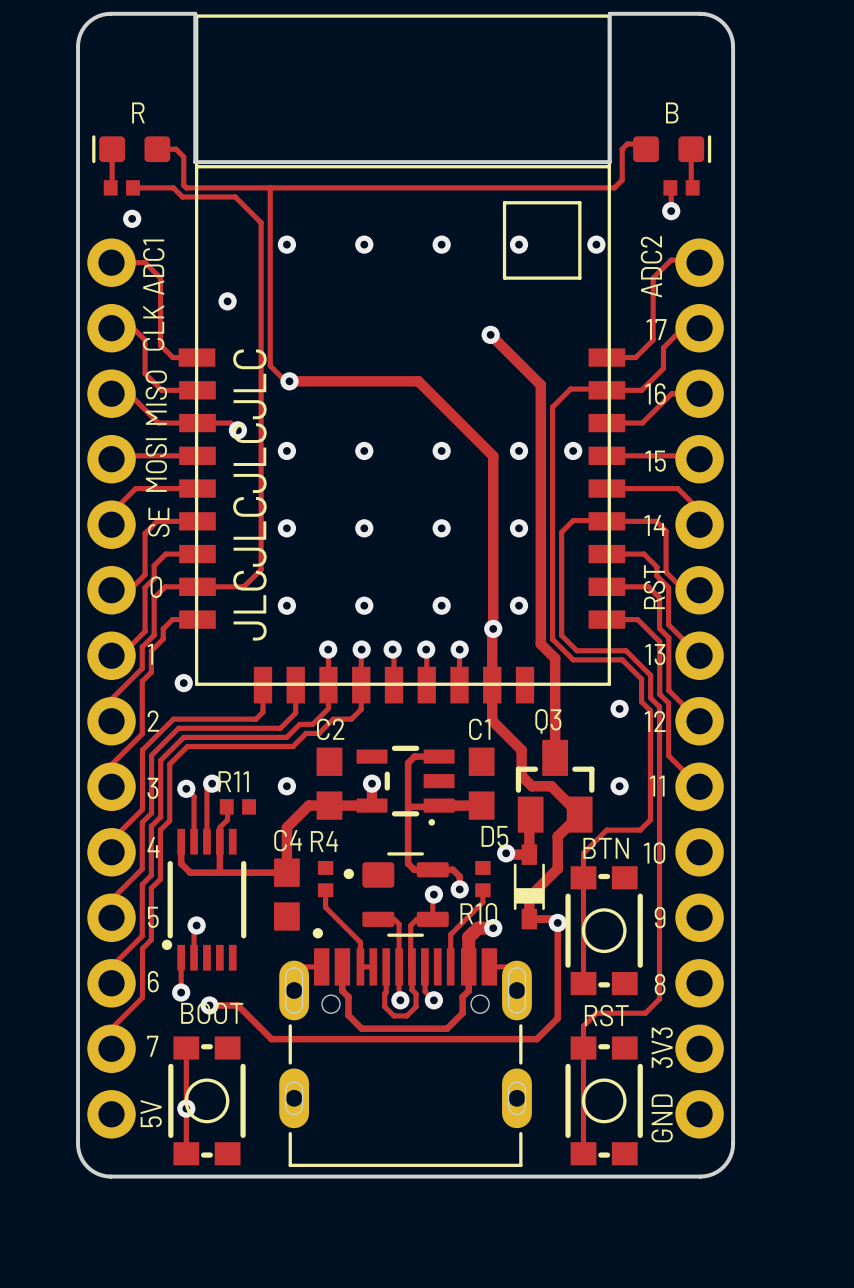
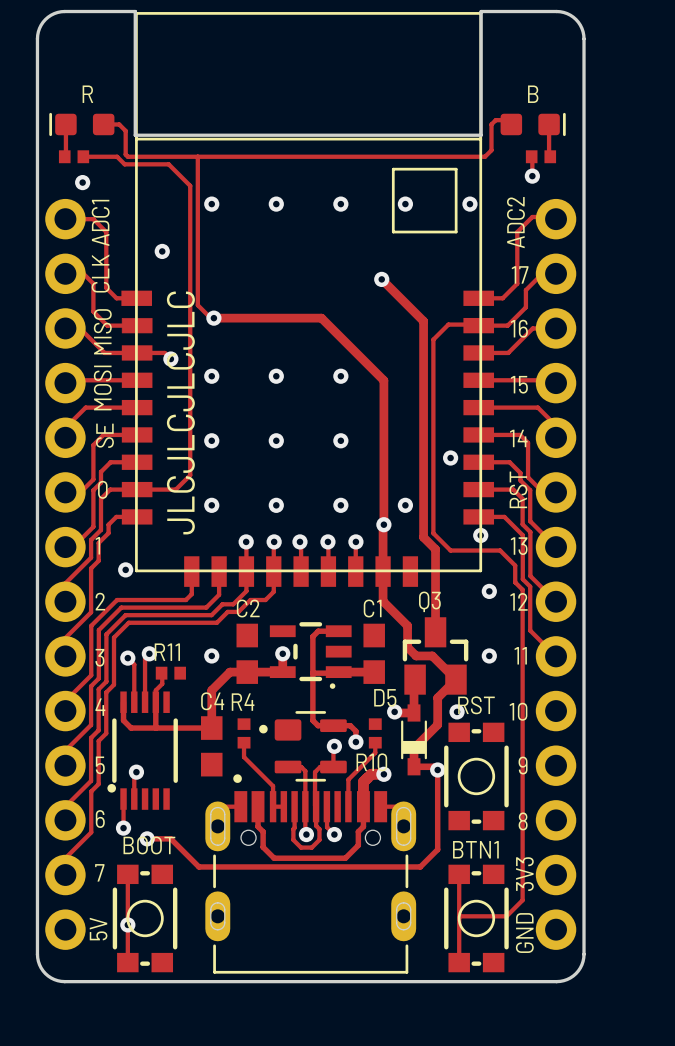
via: (519, 450) -> none
via: (573, 450) -> none
track: (609, 521) (573, 520) (561, 532) (561, 635) (576, 650) (626, 650) (650, 675) (650, 677) -> (491, 550) (500, 550) (515, 565)
via: (519, 528) -> none
via: none -> (450, 458)
via: none -> (480, 535)
track: (622, 659) (641, 679) (641, 701) (650, 710) (650, 819) (640, 830) (606, 830) (583, 853) (583, 983) -> none
BTN name: BTN (606, 848) -> RST (476, 705)
via: none -> (457, 711)
track: (659, 999) (645, 1013) (596, 1013) (583, 1026) (583, 1048) -> (522, 833) (522, 900) (506, 916) (459, 916)
RST name: RST (606, 1015) -> BTN1 (475, 849)

